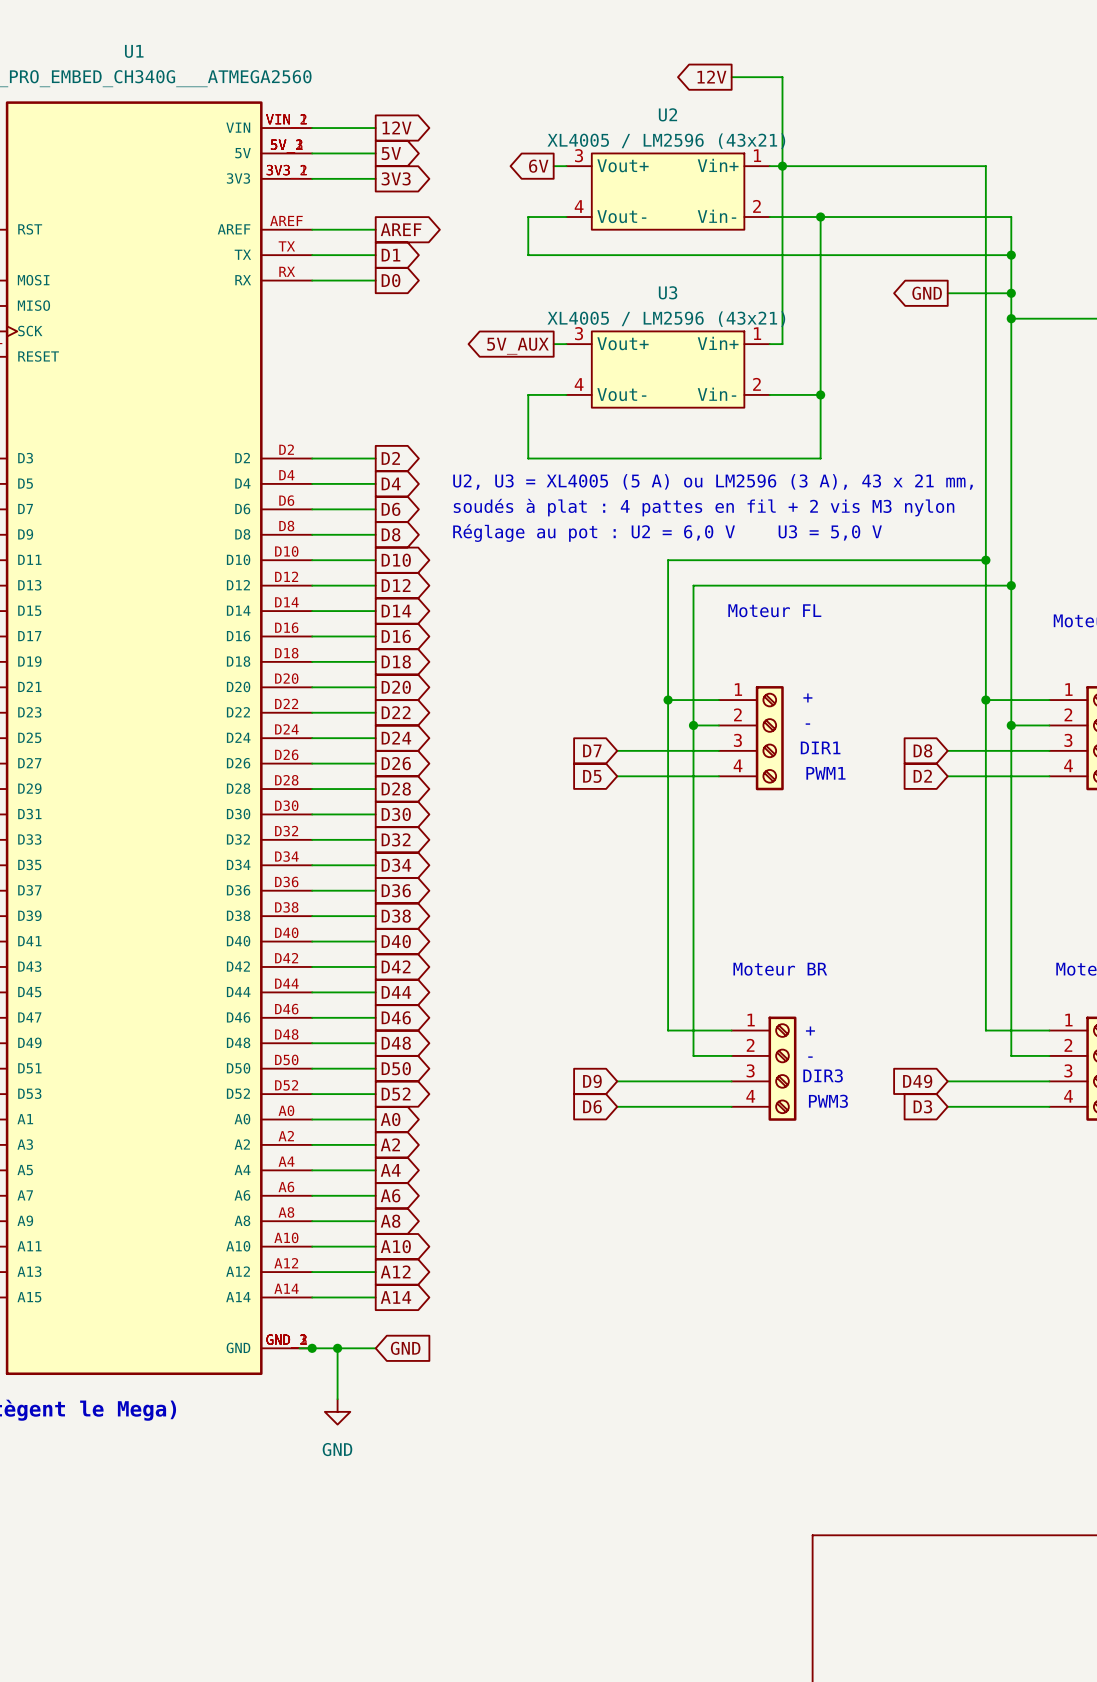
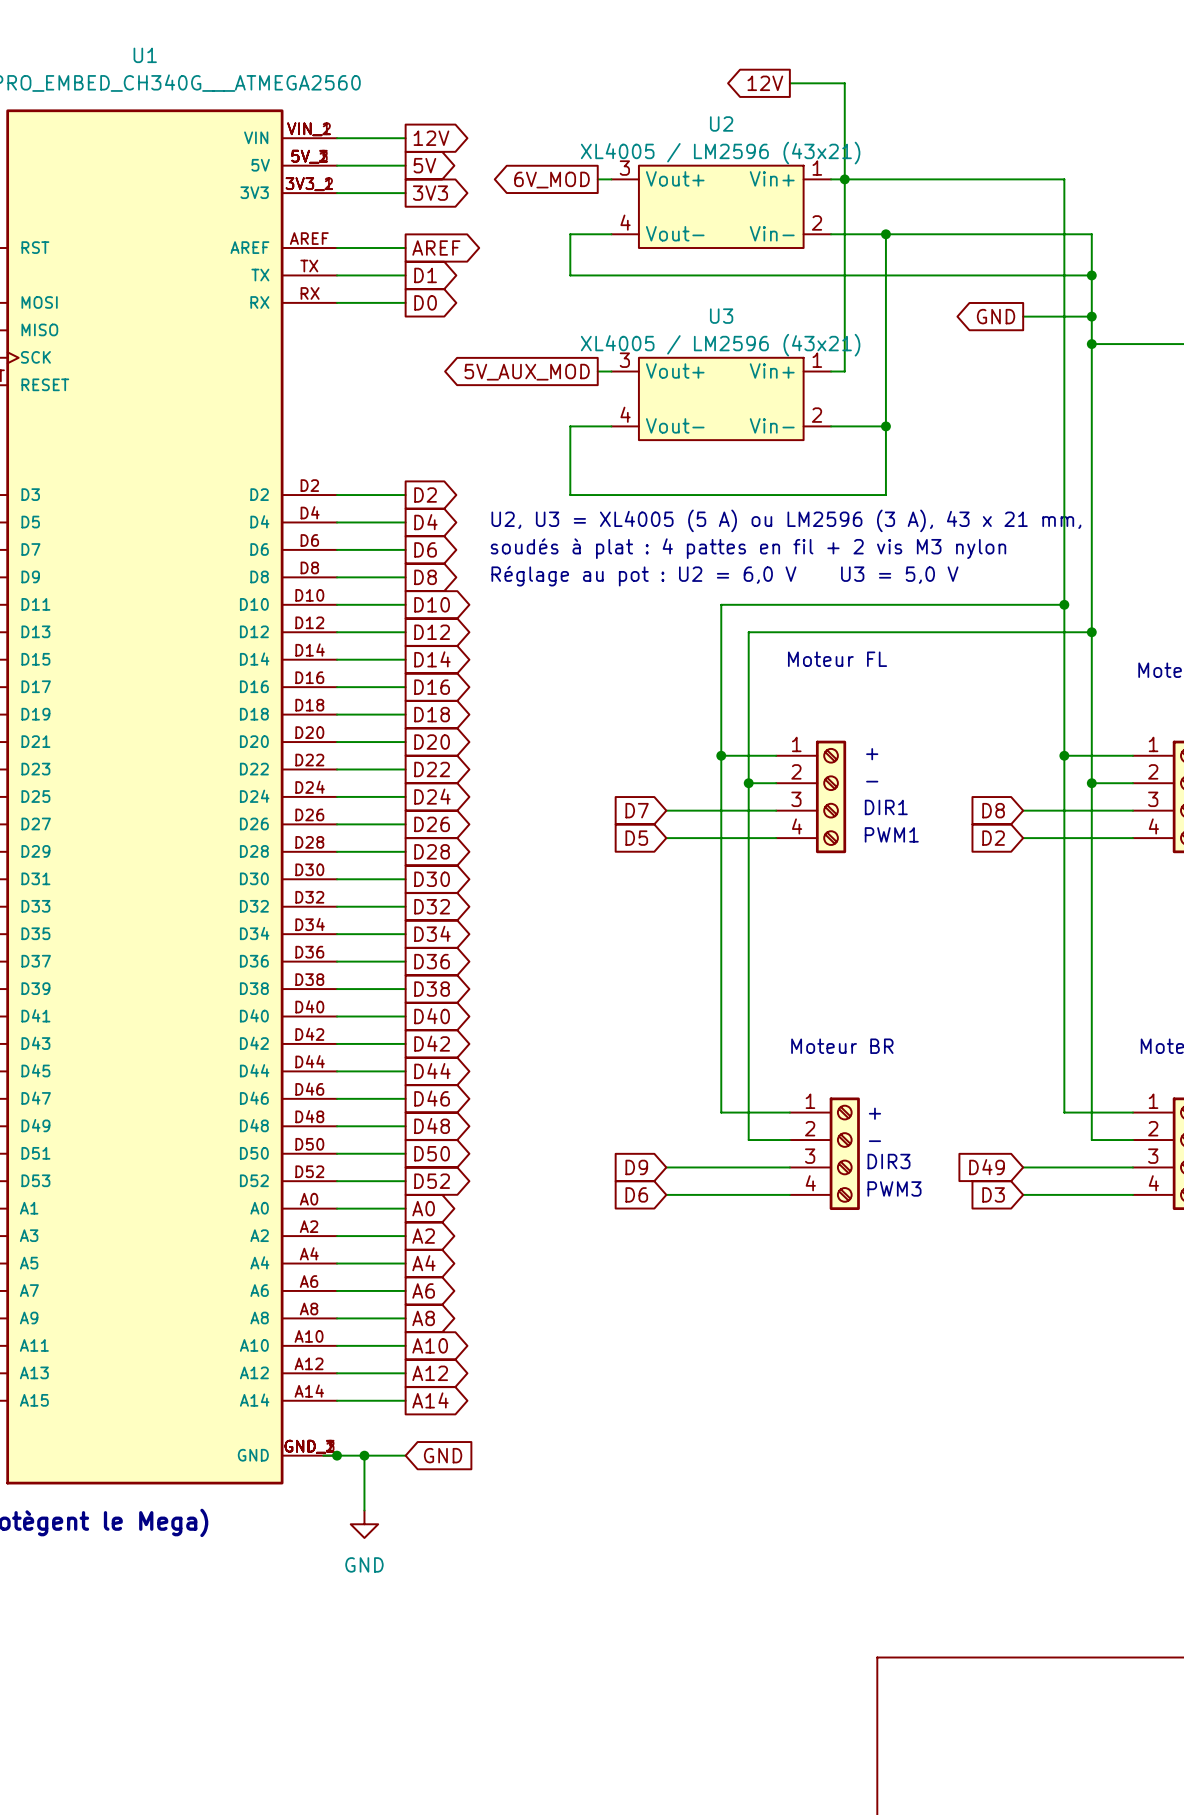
global label: 6V (538, 166) -> 6V_MOD (551, 180)
global label: 5V_AUX (517, 346) -> 5V_AUX_MOD (527, 372)

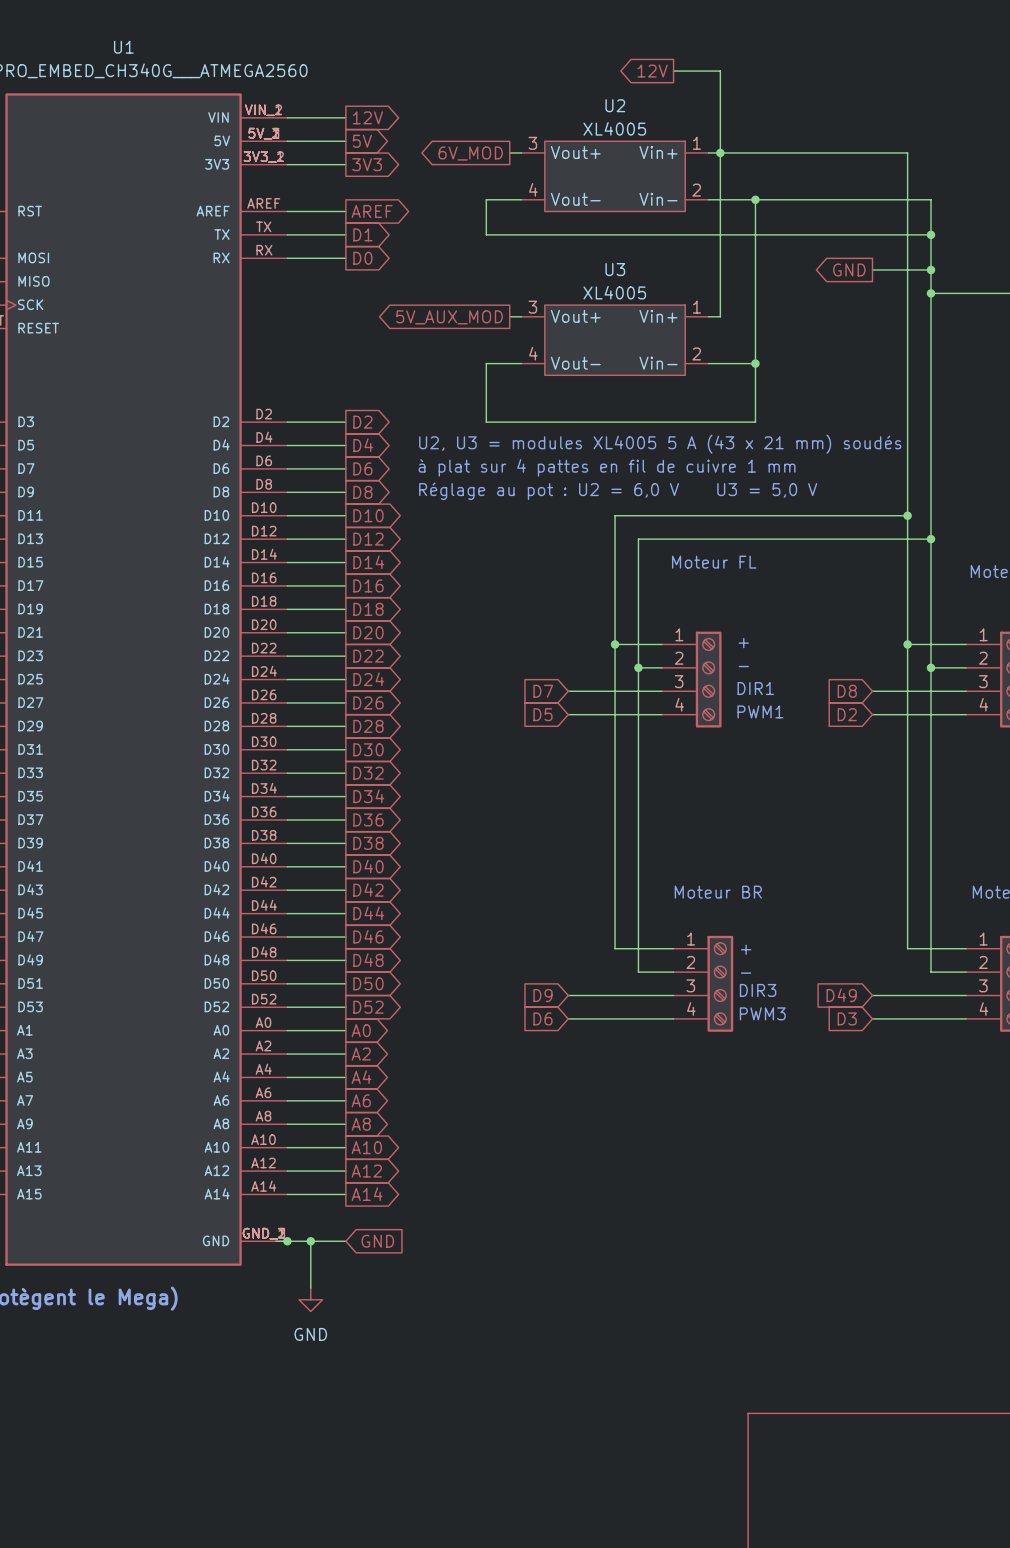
U2 value: XL4005 / LM2596 (43x21) (720, 153) -> XL4005 (614, 128)
U3 value: XL4005 / LM2596 (43x21) (720, 345) -> XL4005 (614, 292)
text: U2, U3 = XL4005 (5 A) ou LM2596 (3 A), 43 x 21 mm, (786, 520) -> U2, U3 = modules XL4005 5 A (43 x 21 mm) soudés (660, 444)
text: soudés à plat : 4 pattes en fil + 2 vis M3 nylon (748, 548) -> à plat sur 4 pattes en fil de cuivre 1 mm (607, 467)

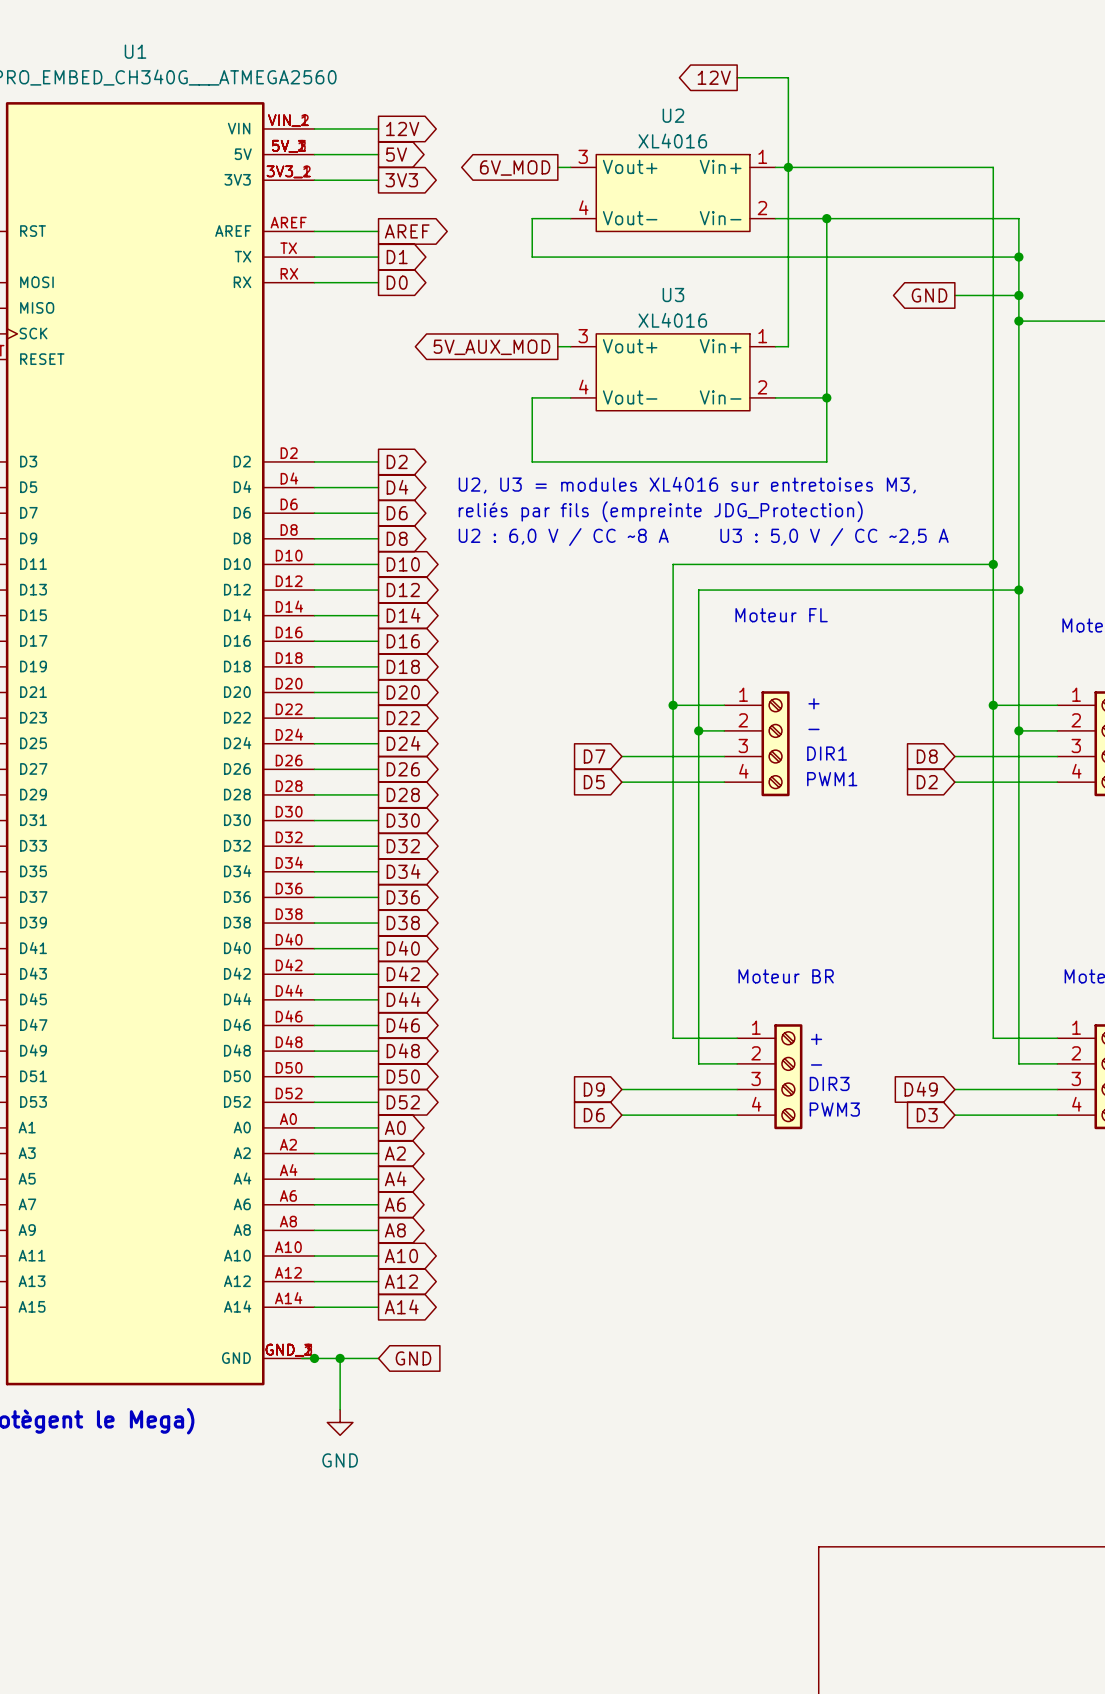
U2 value: XL4005 (614, 128) -> XL4016 (672, 141)
U3 value: XL4005 (614, 292) -> XL4016 (672, 320)
text: U2, U3 = modules XL4005 5 A (43 x 21 mm) soudés (660, 444) -> U2, U3 = modules XL4016 sur entretoises M3, (687, 485)
text: à plat sur 4 pattes en fil de cuivre 1 mm (607, 467) -> reliés par fils (empreinte JDG_Protection) (660, 511)
text: Réglage au pot : U2 = 6,0 V U3 = 5,0 V (618, 491) -> U2 : 6,0 V / CC ~8 A U3 : 5,0 V / CC ~2,5 A (703, 537)

